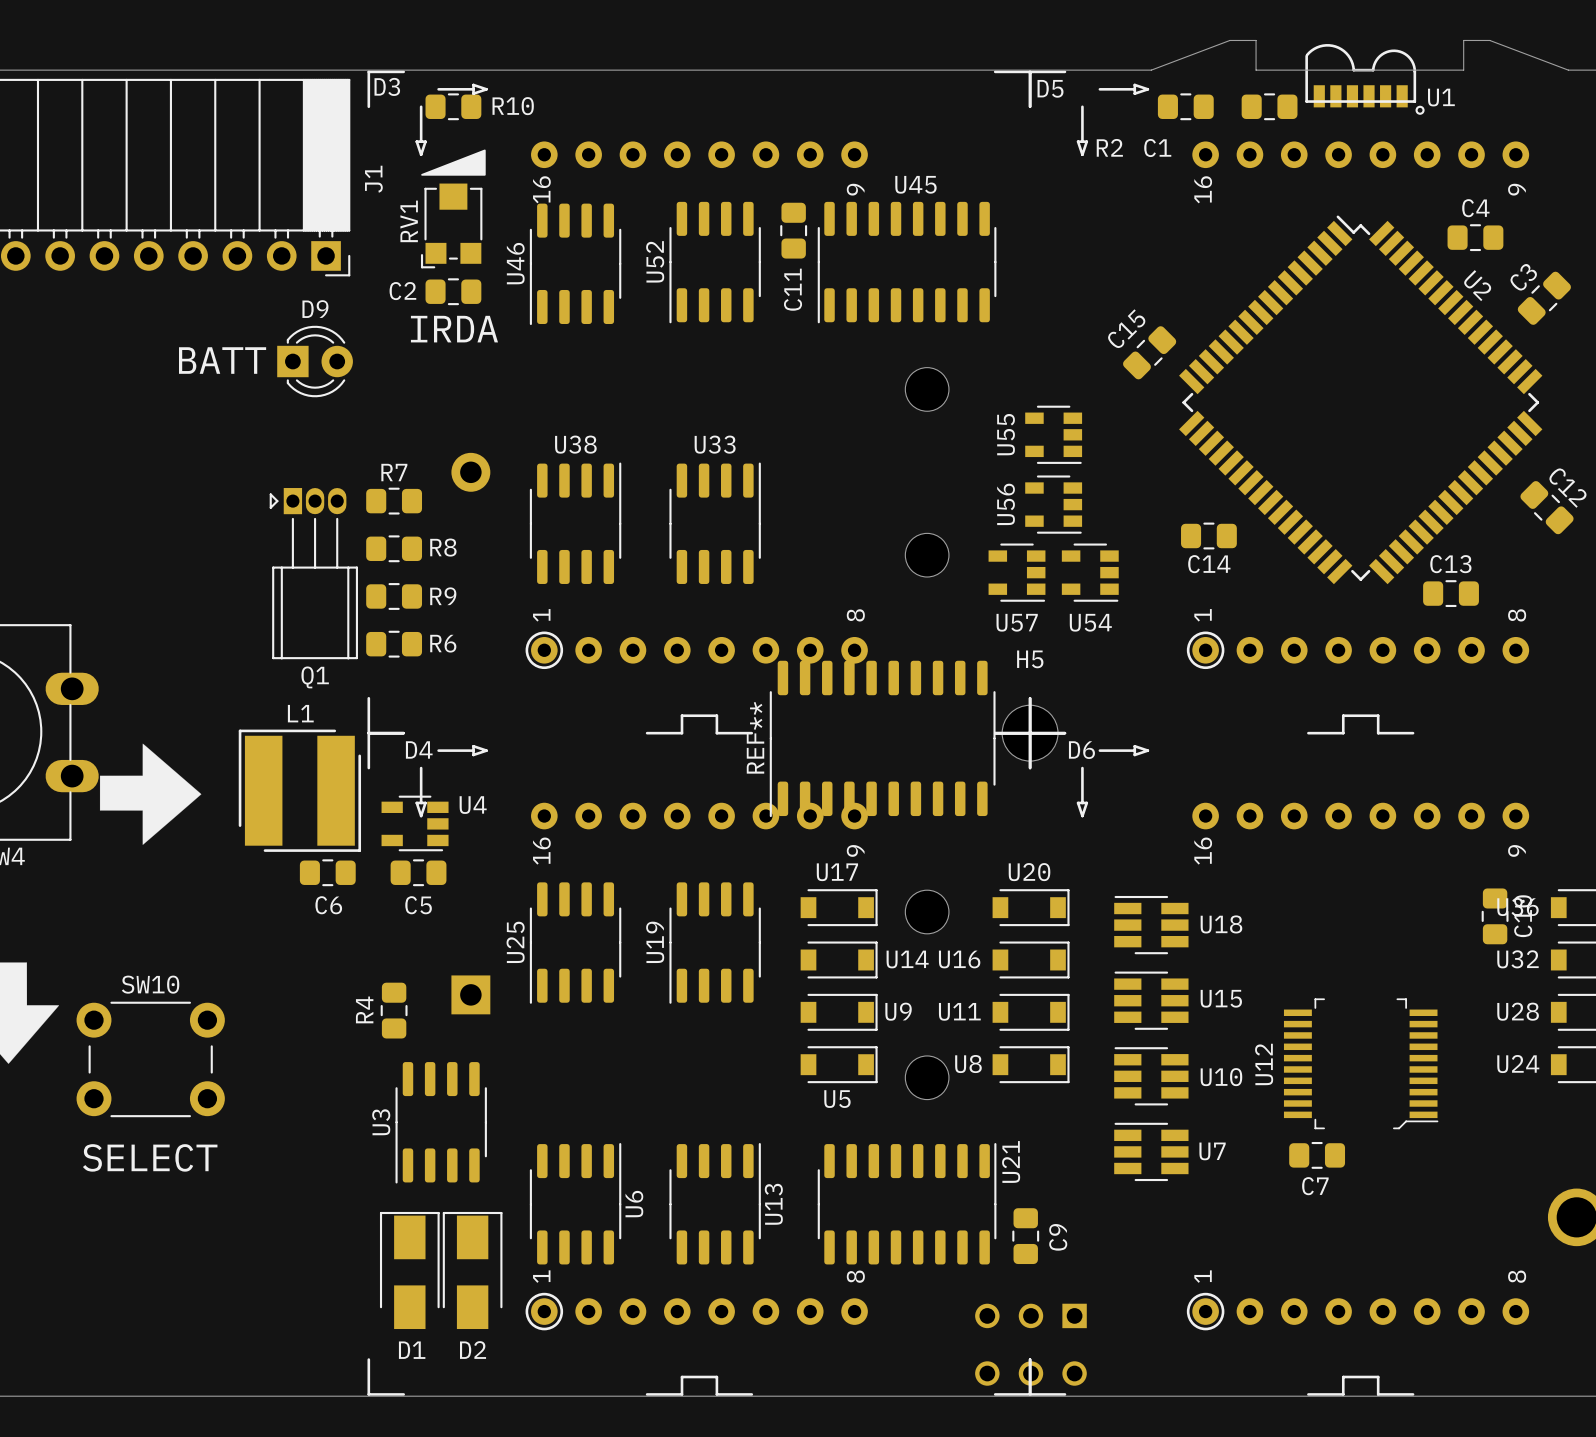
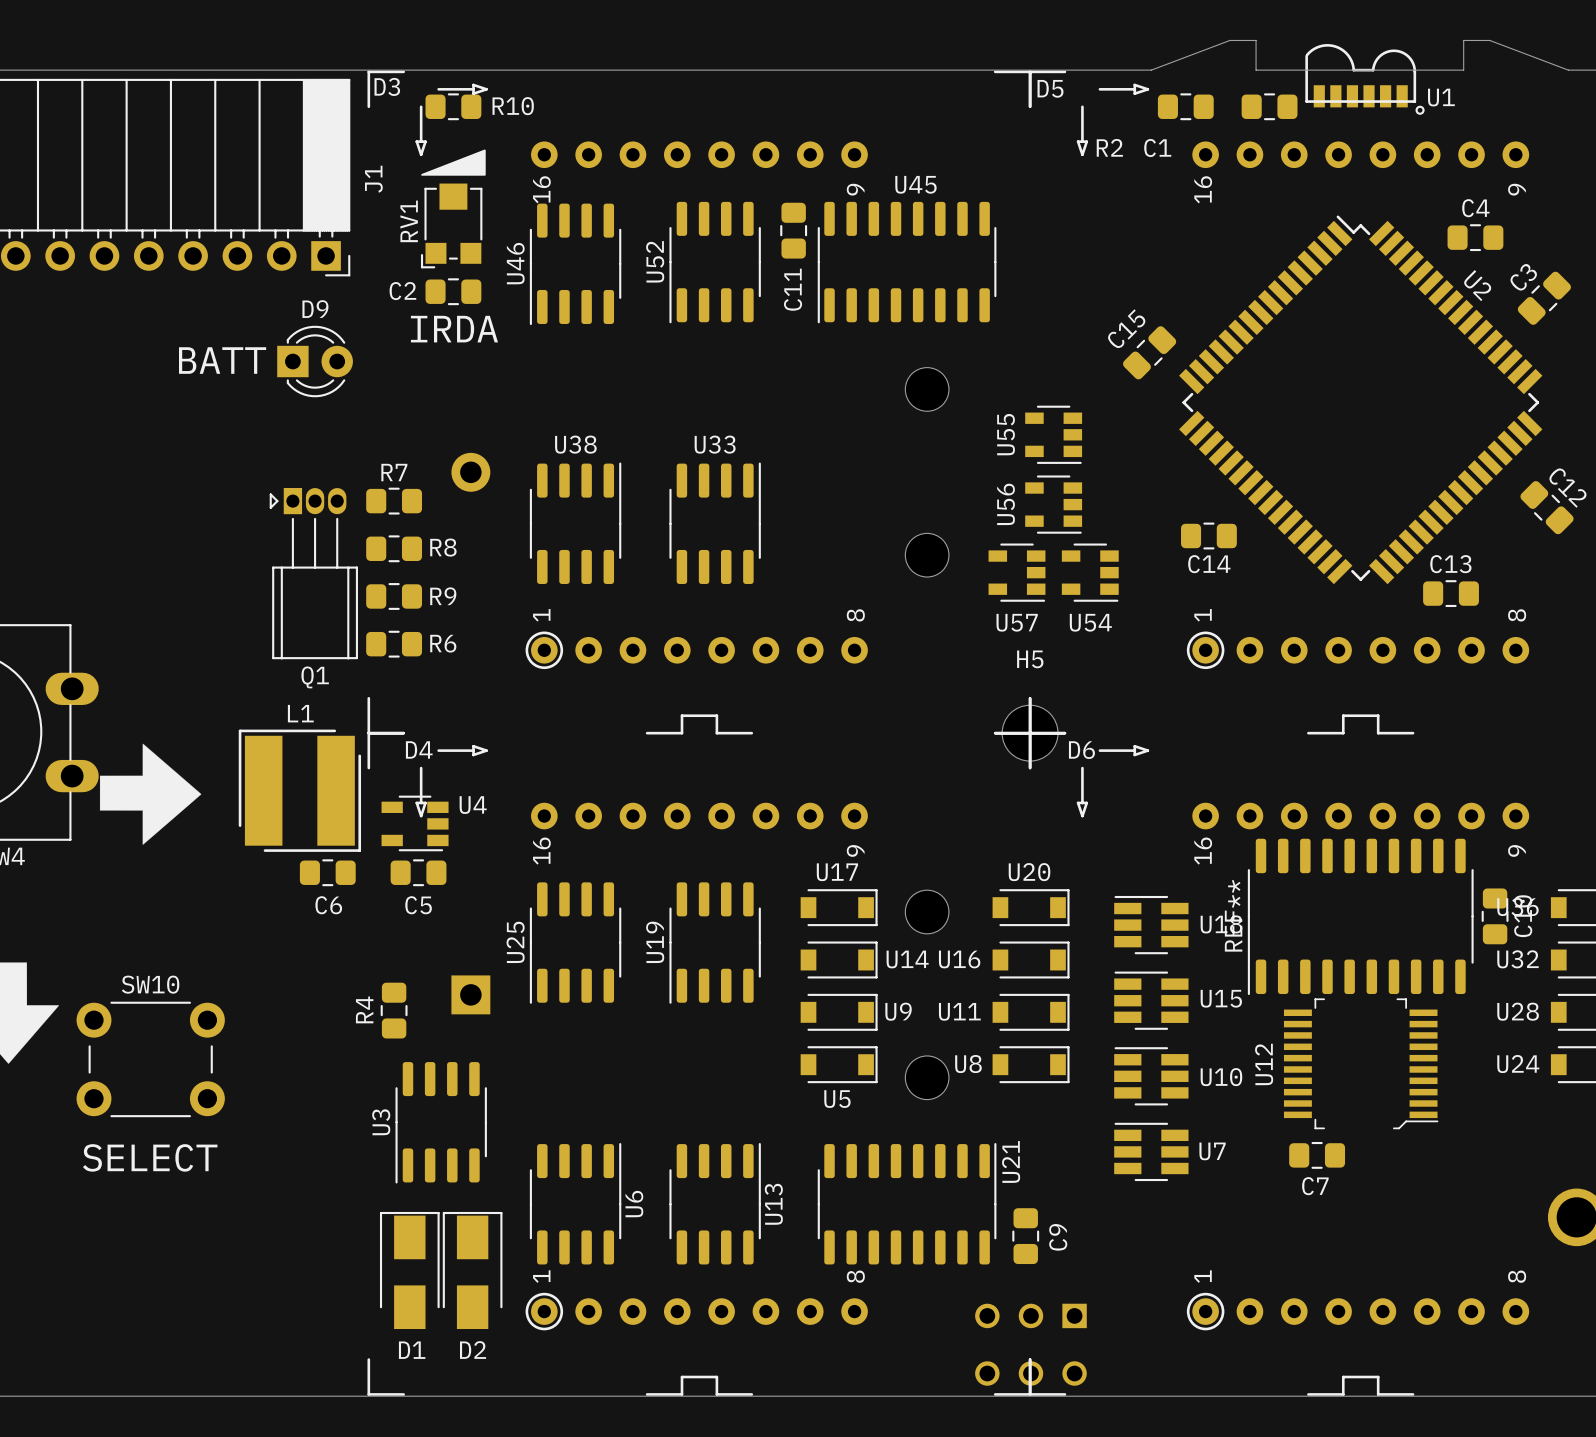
REF**: (882, 738) -> none
REF**: none -> (1360, 916)

